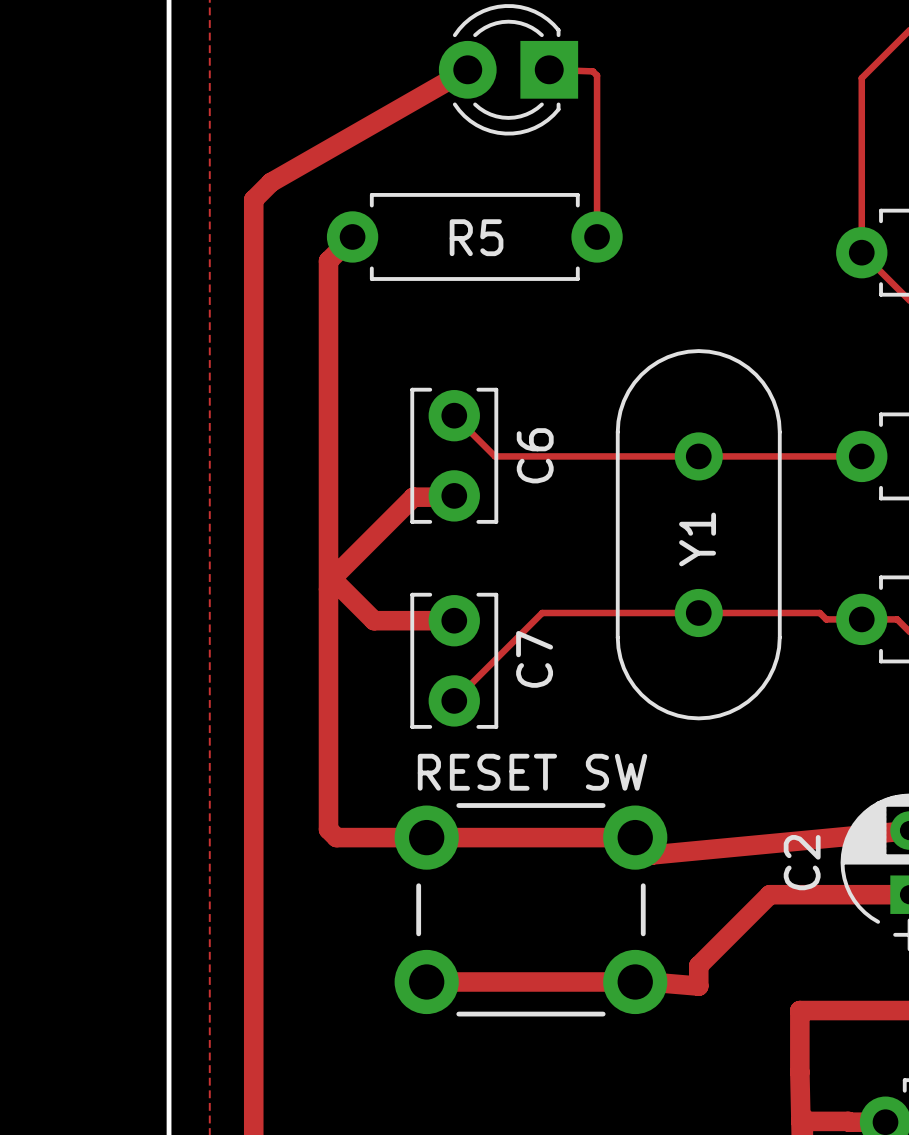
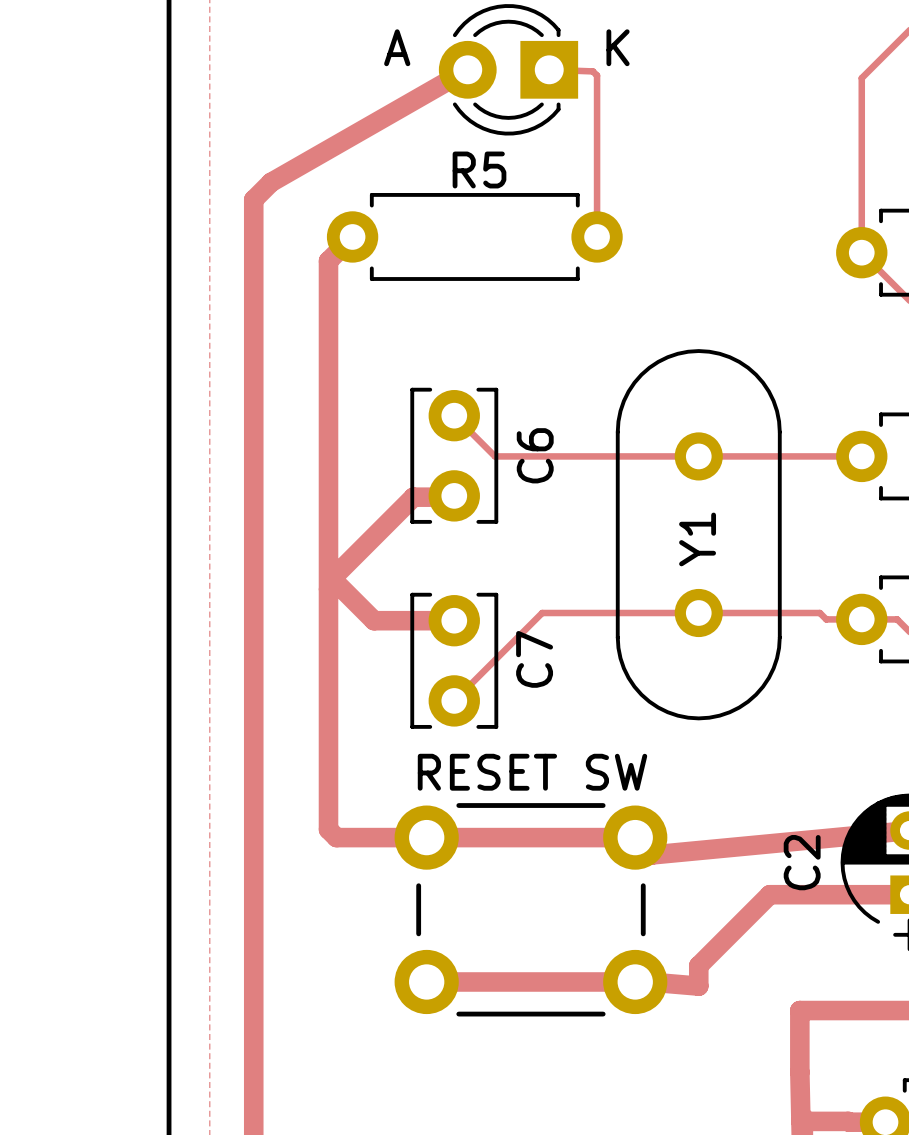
text: none -> A (397, 47)
text: none -> K (618, 47)
R5 name position: R5 (476, 237) -> R5 (479, 169)

